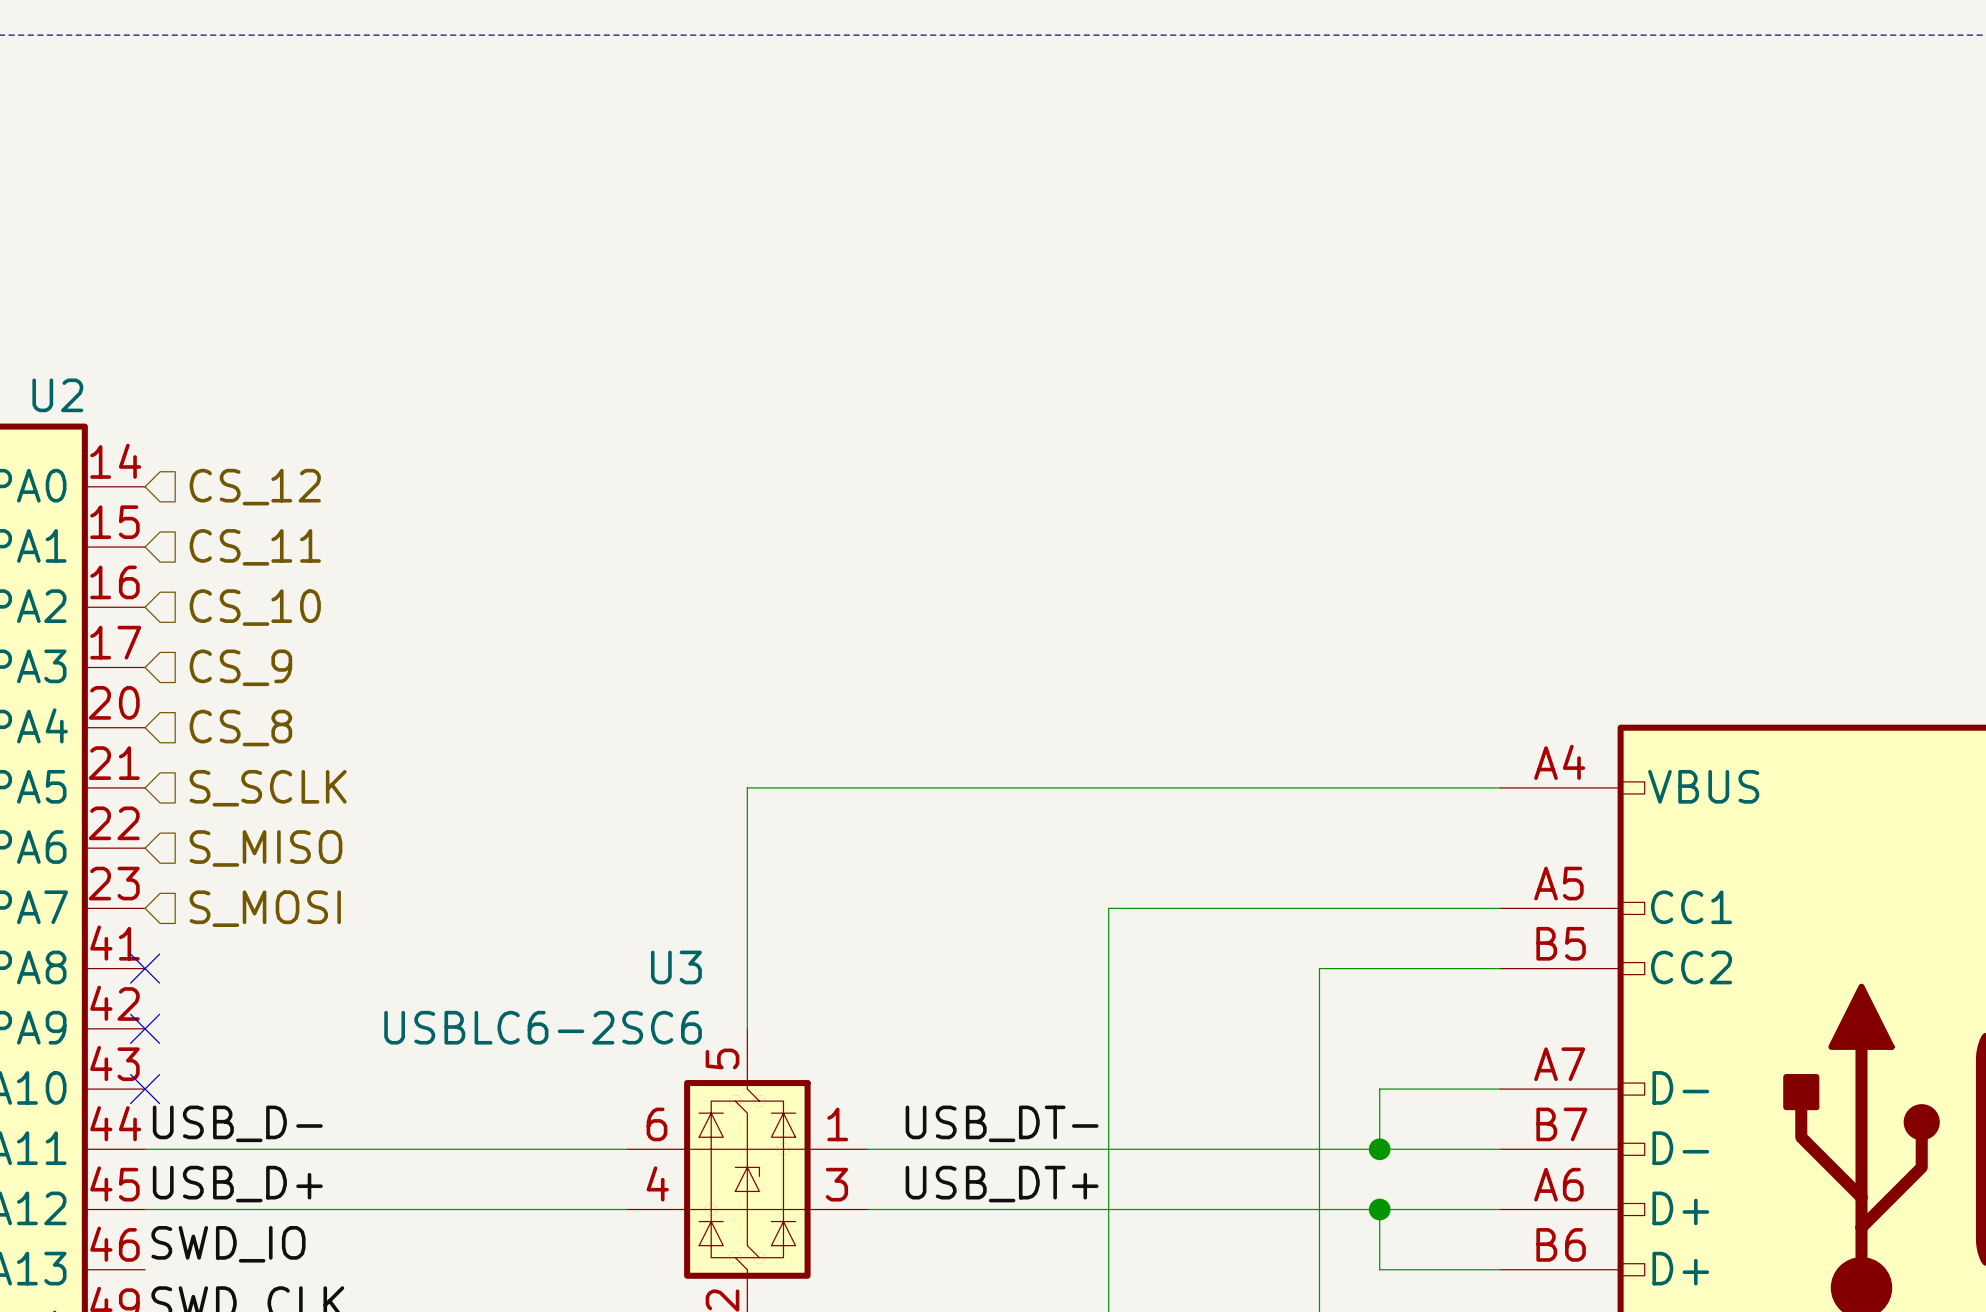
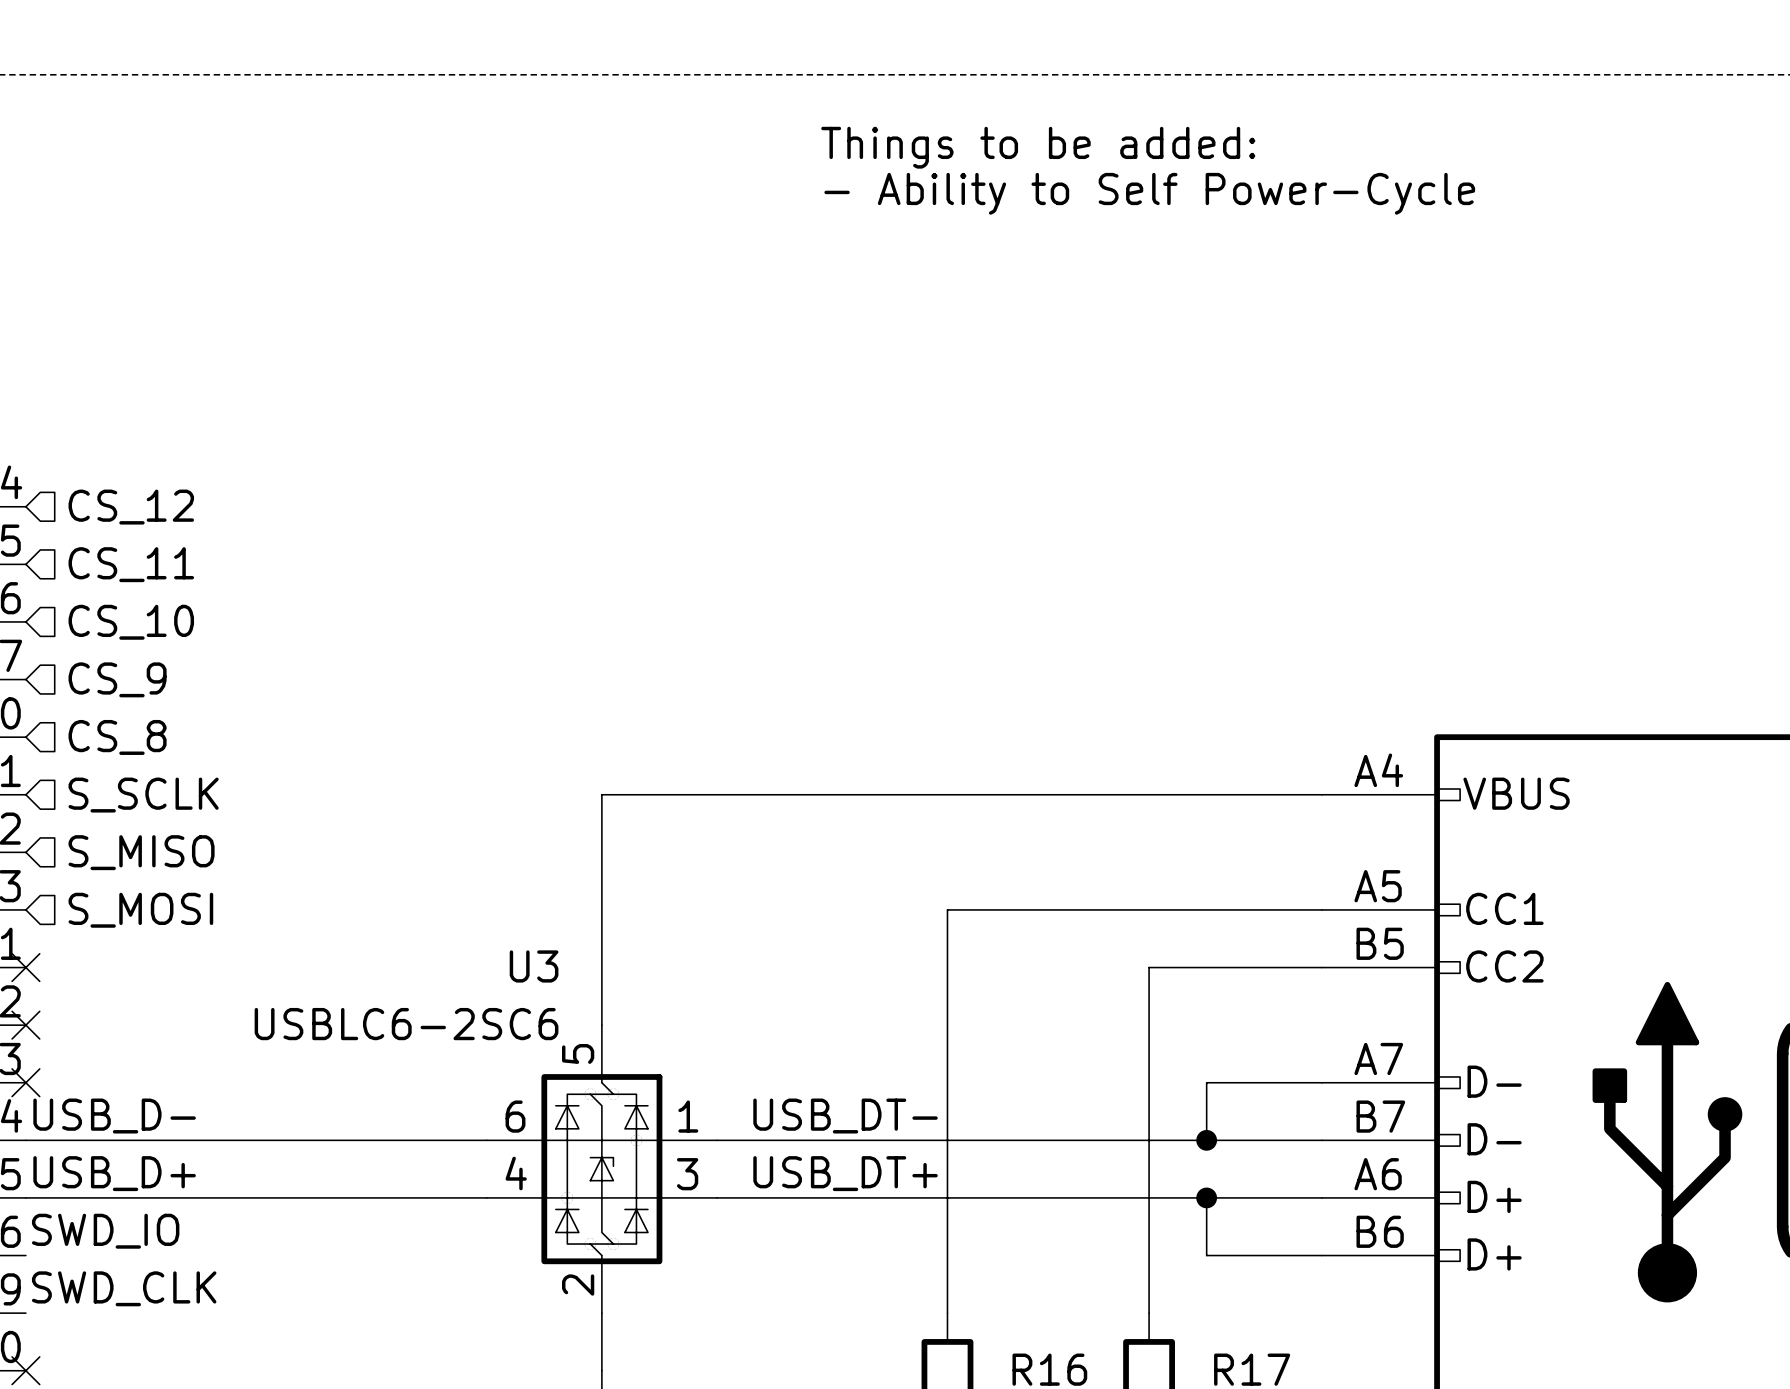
text: none -> Things to be added: (1038, 147)
text: none -> - Ability to Self Power-Cycle (1149, 193)

